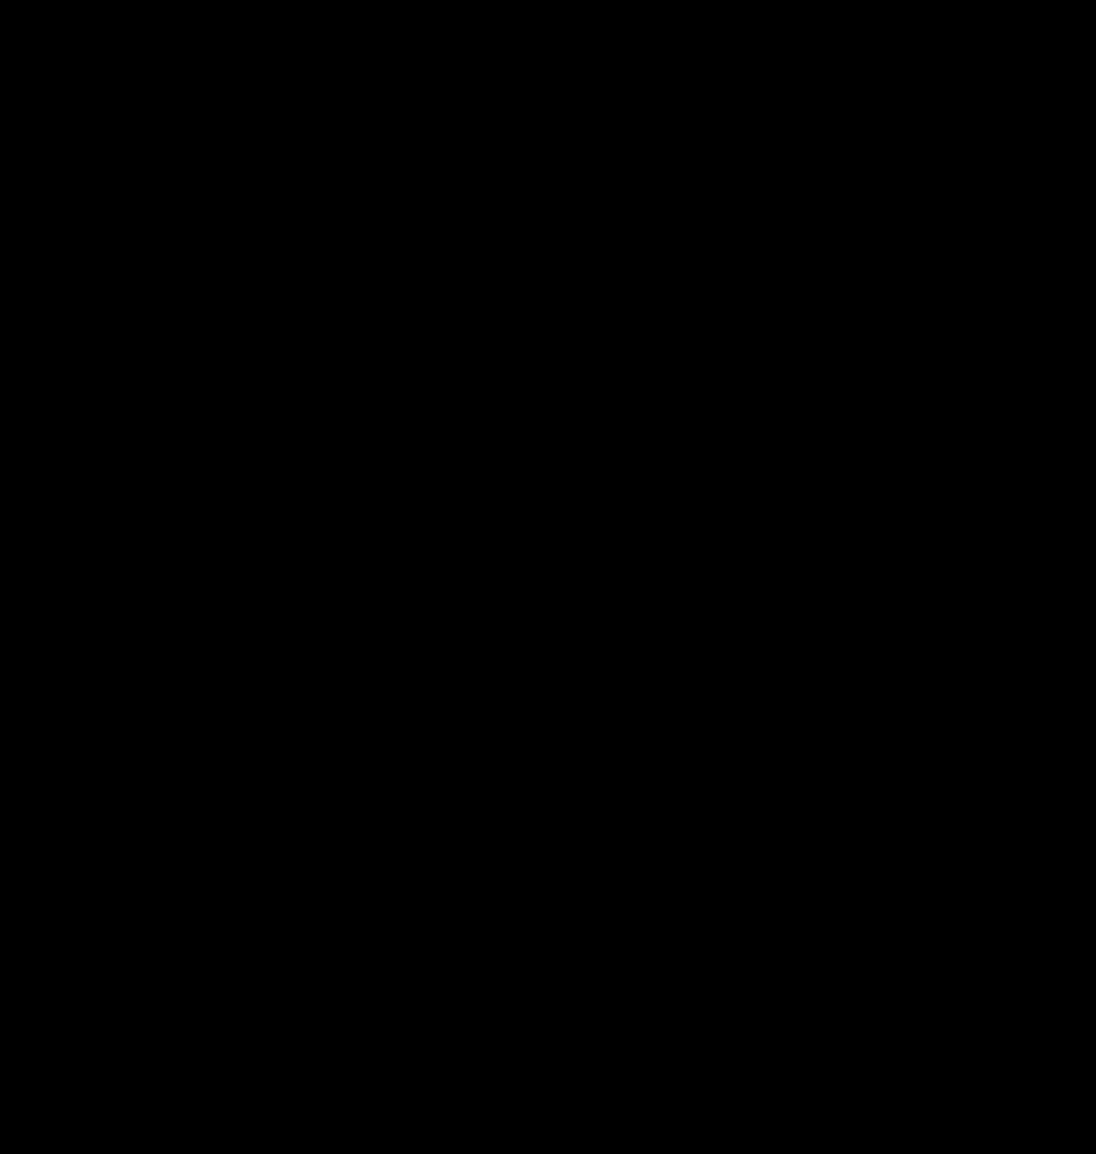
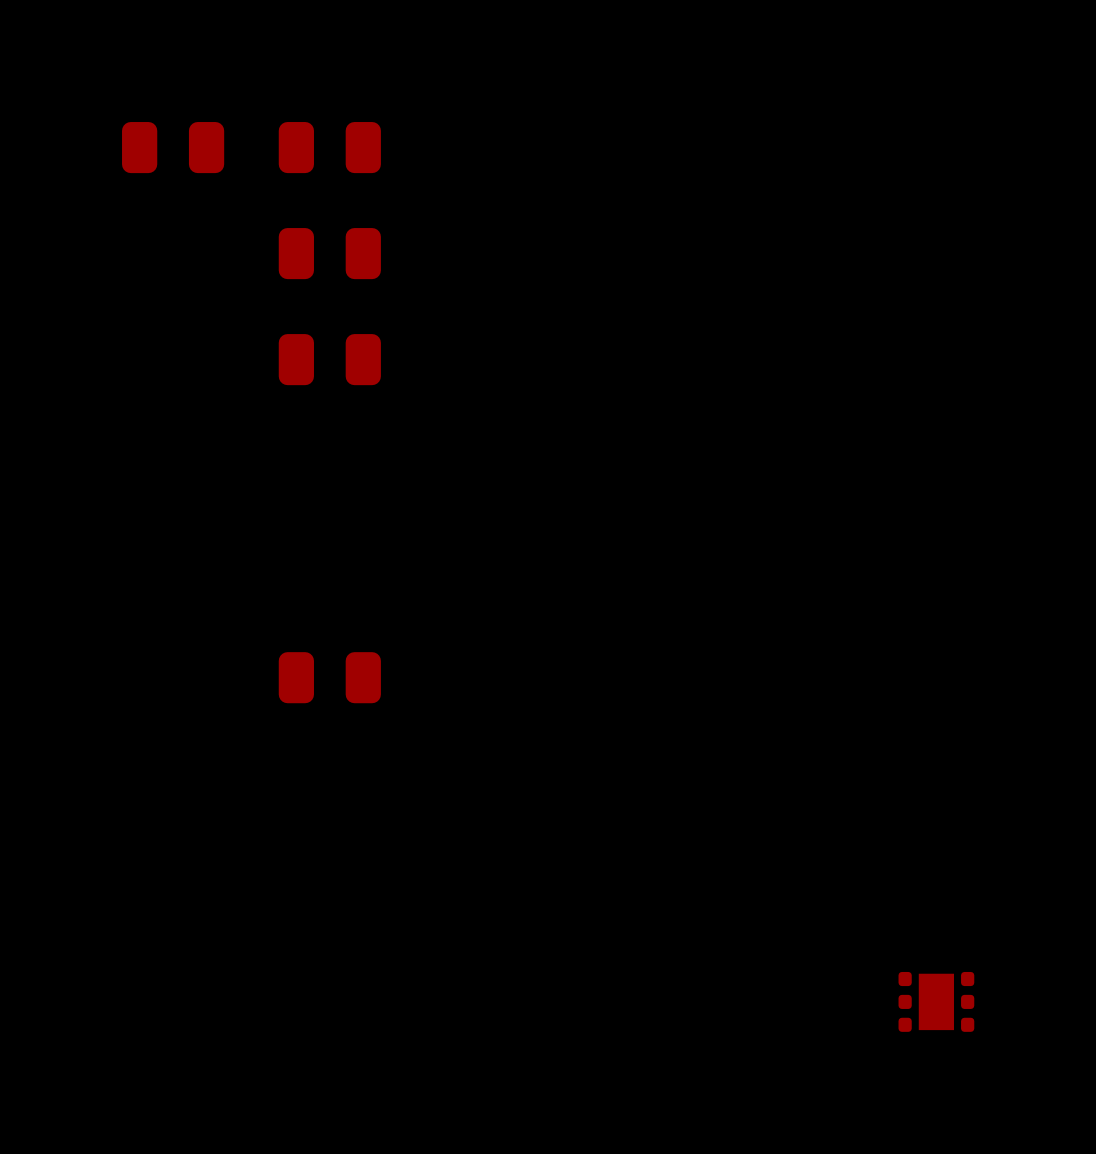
part: none -> (173, 147)
part: none -> (329, 147)
part: none -> (329, 253)
part: none -> (329, 359)
part: none -> (329, 677)
part: none -> (936, 1001)

